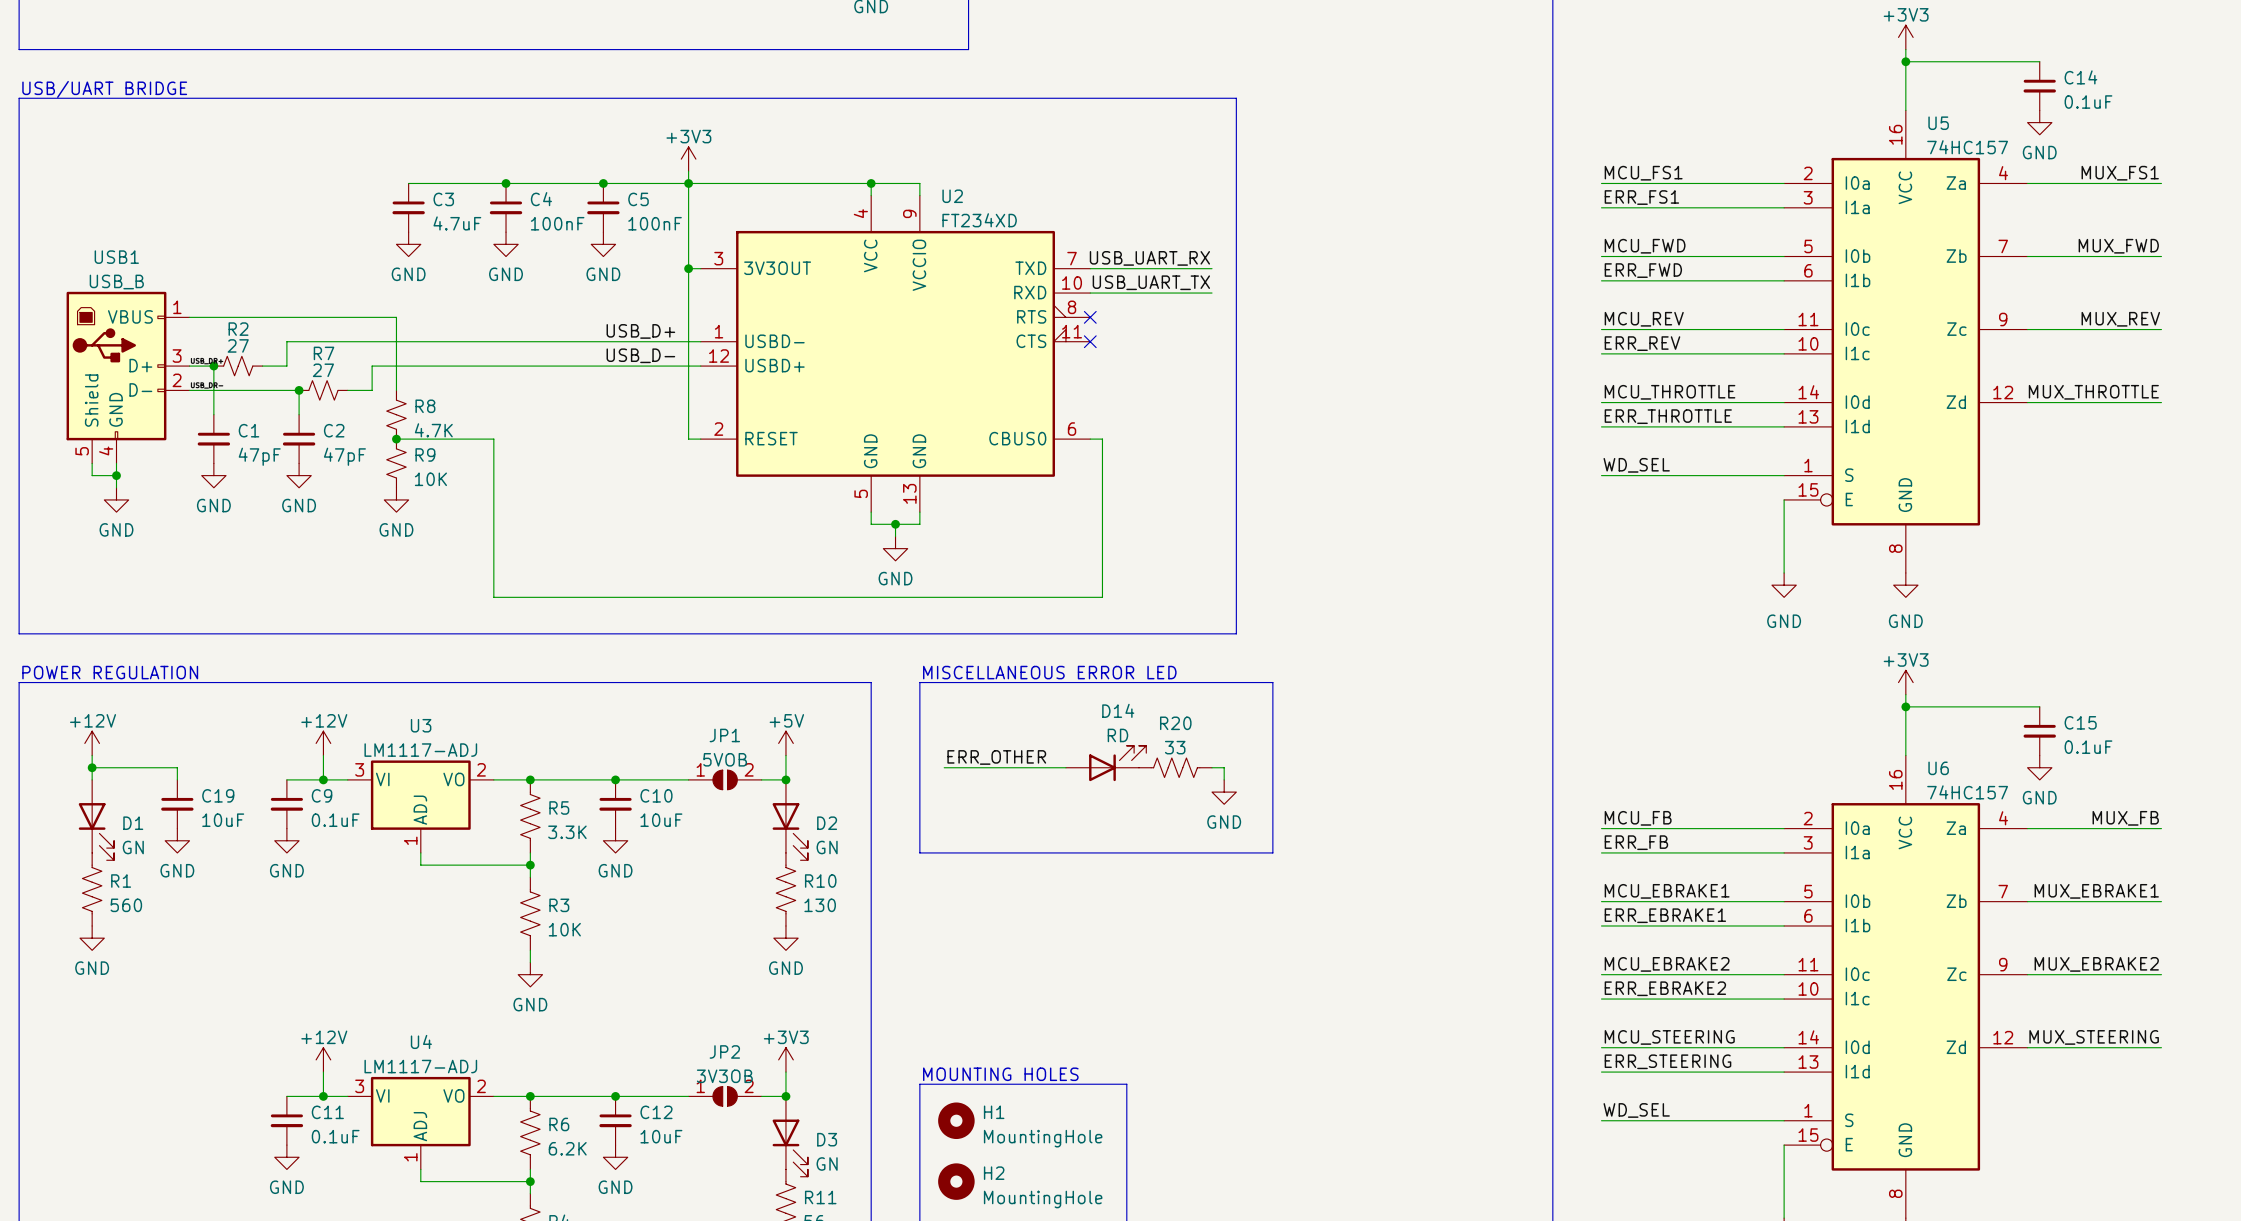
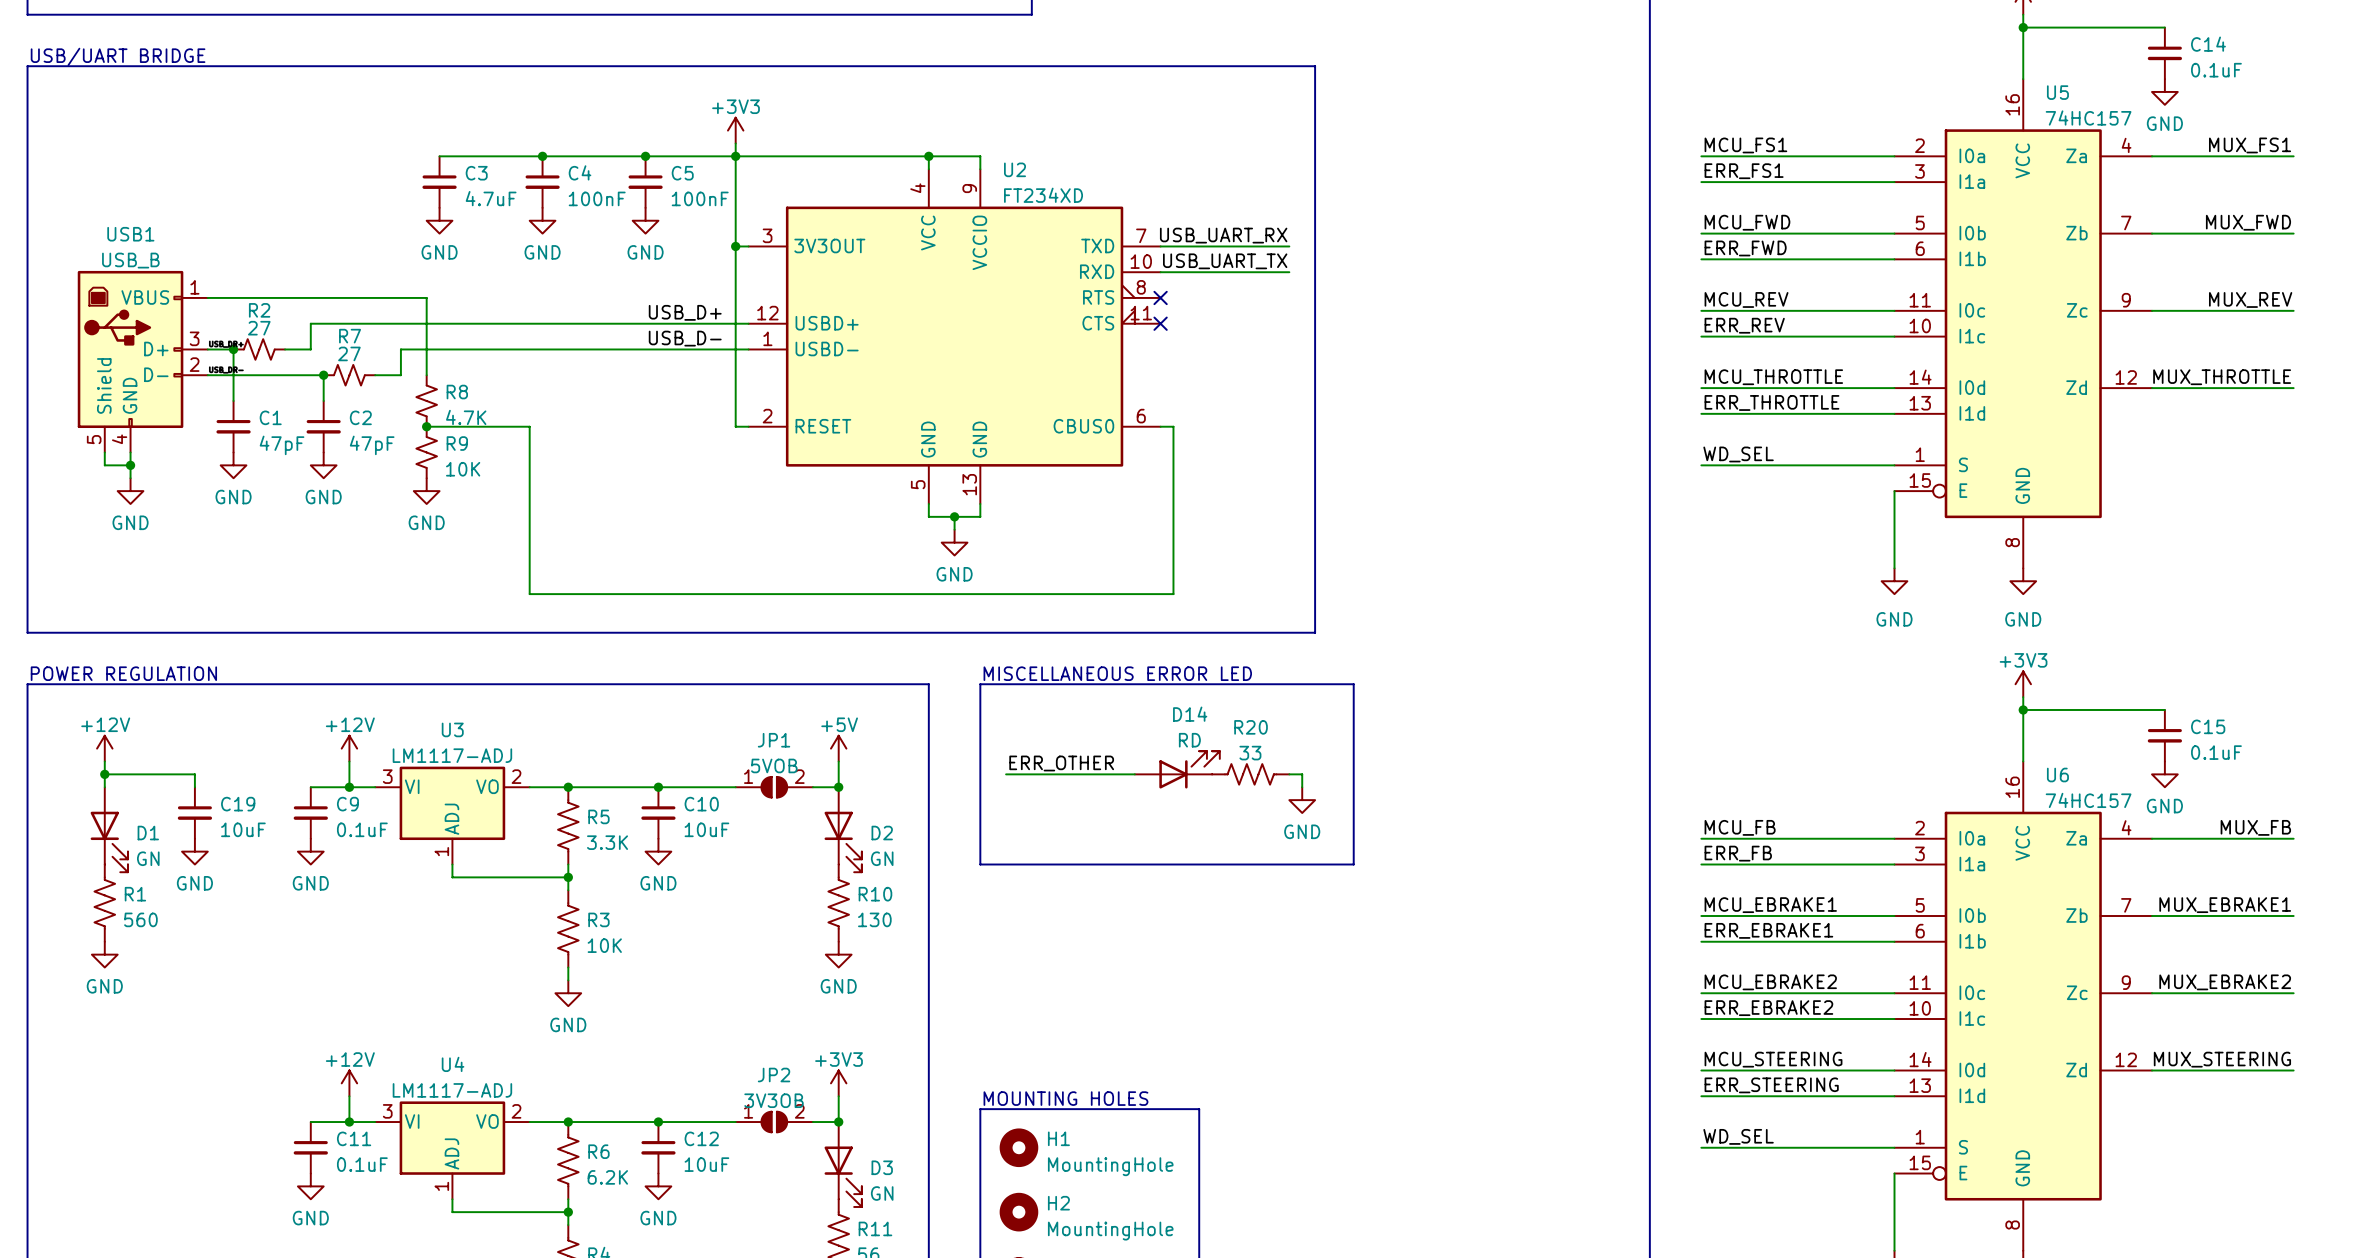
U2 pin number: 1 (719, 331) -> 12 (767, 313)
U2 pin name: USBD- (775, 341) -> USBD+ (827, 323)
U2 pin number: 12 (719, 356) -> 1 (767, 338)
U2 pin name: USBD+ (775, 365) -> USBD- (827, 348)

